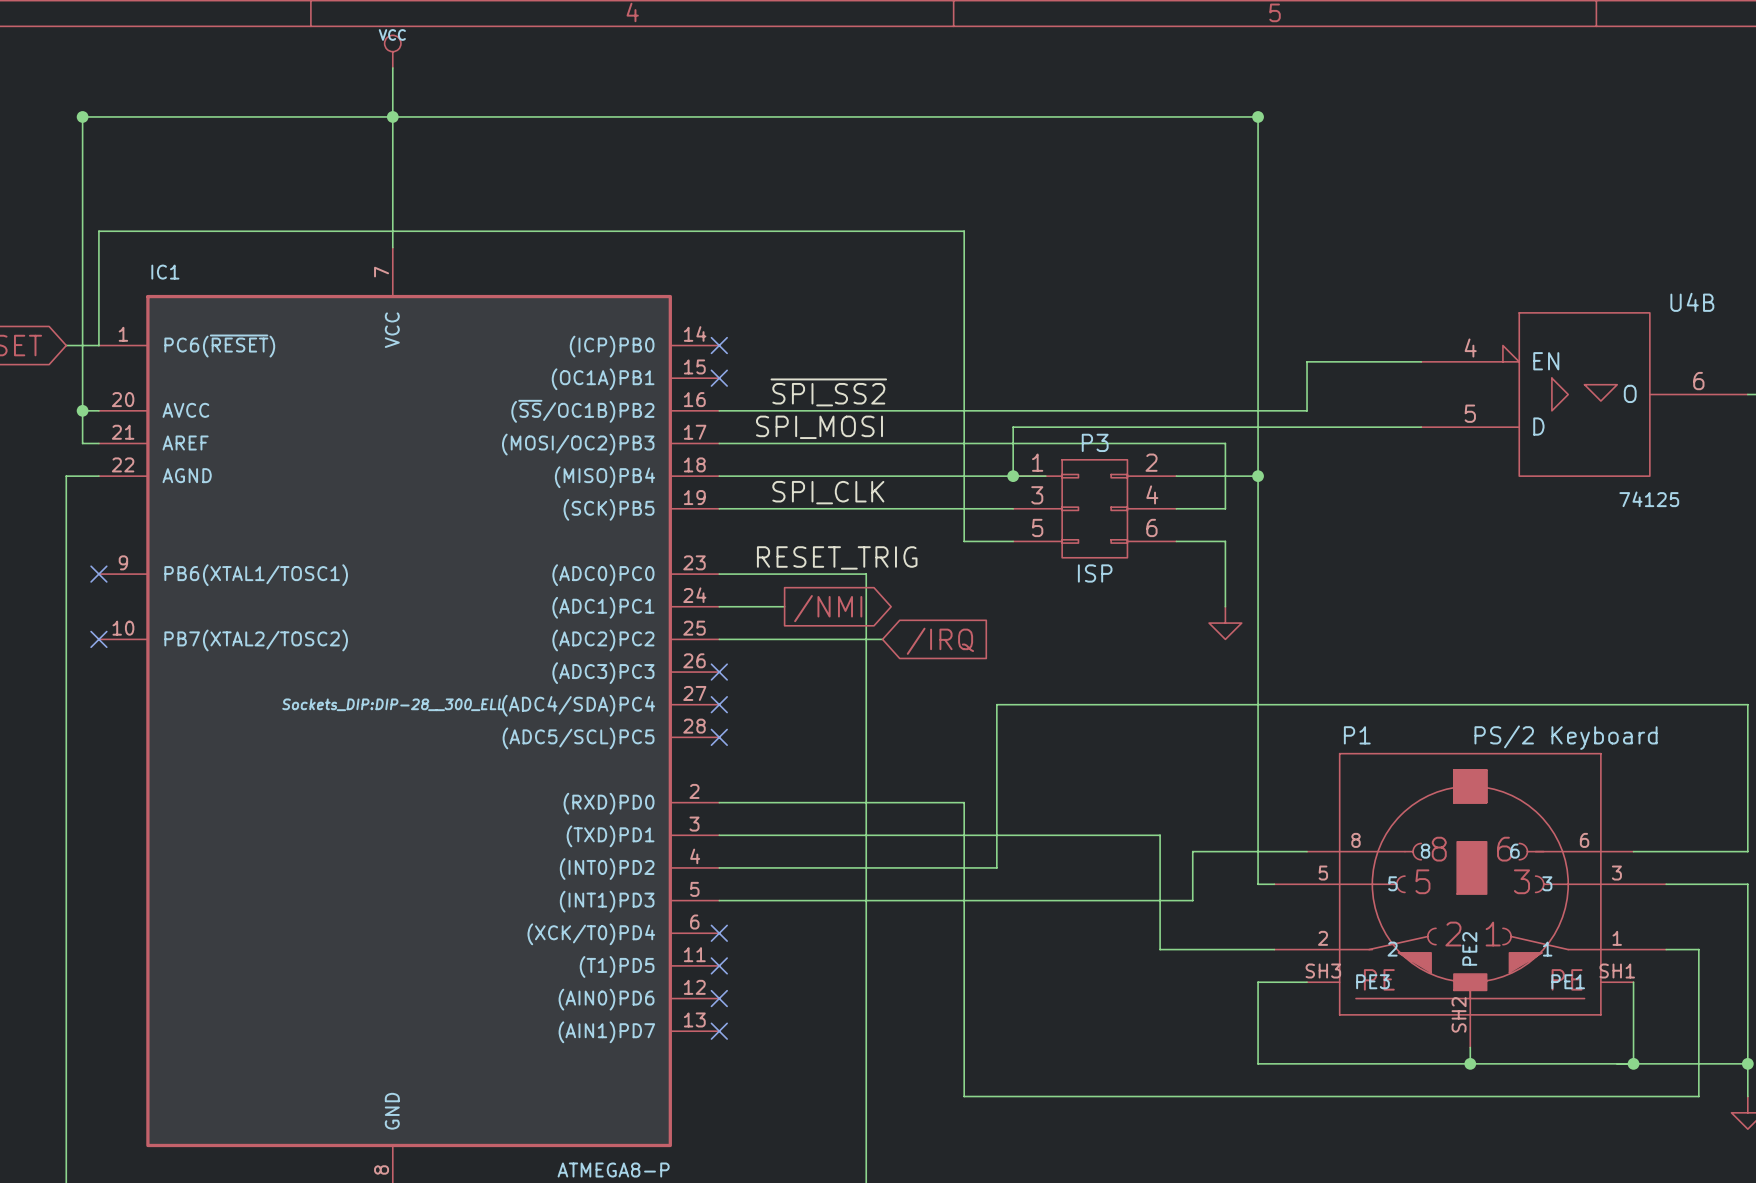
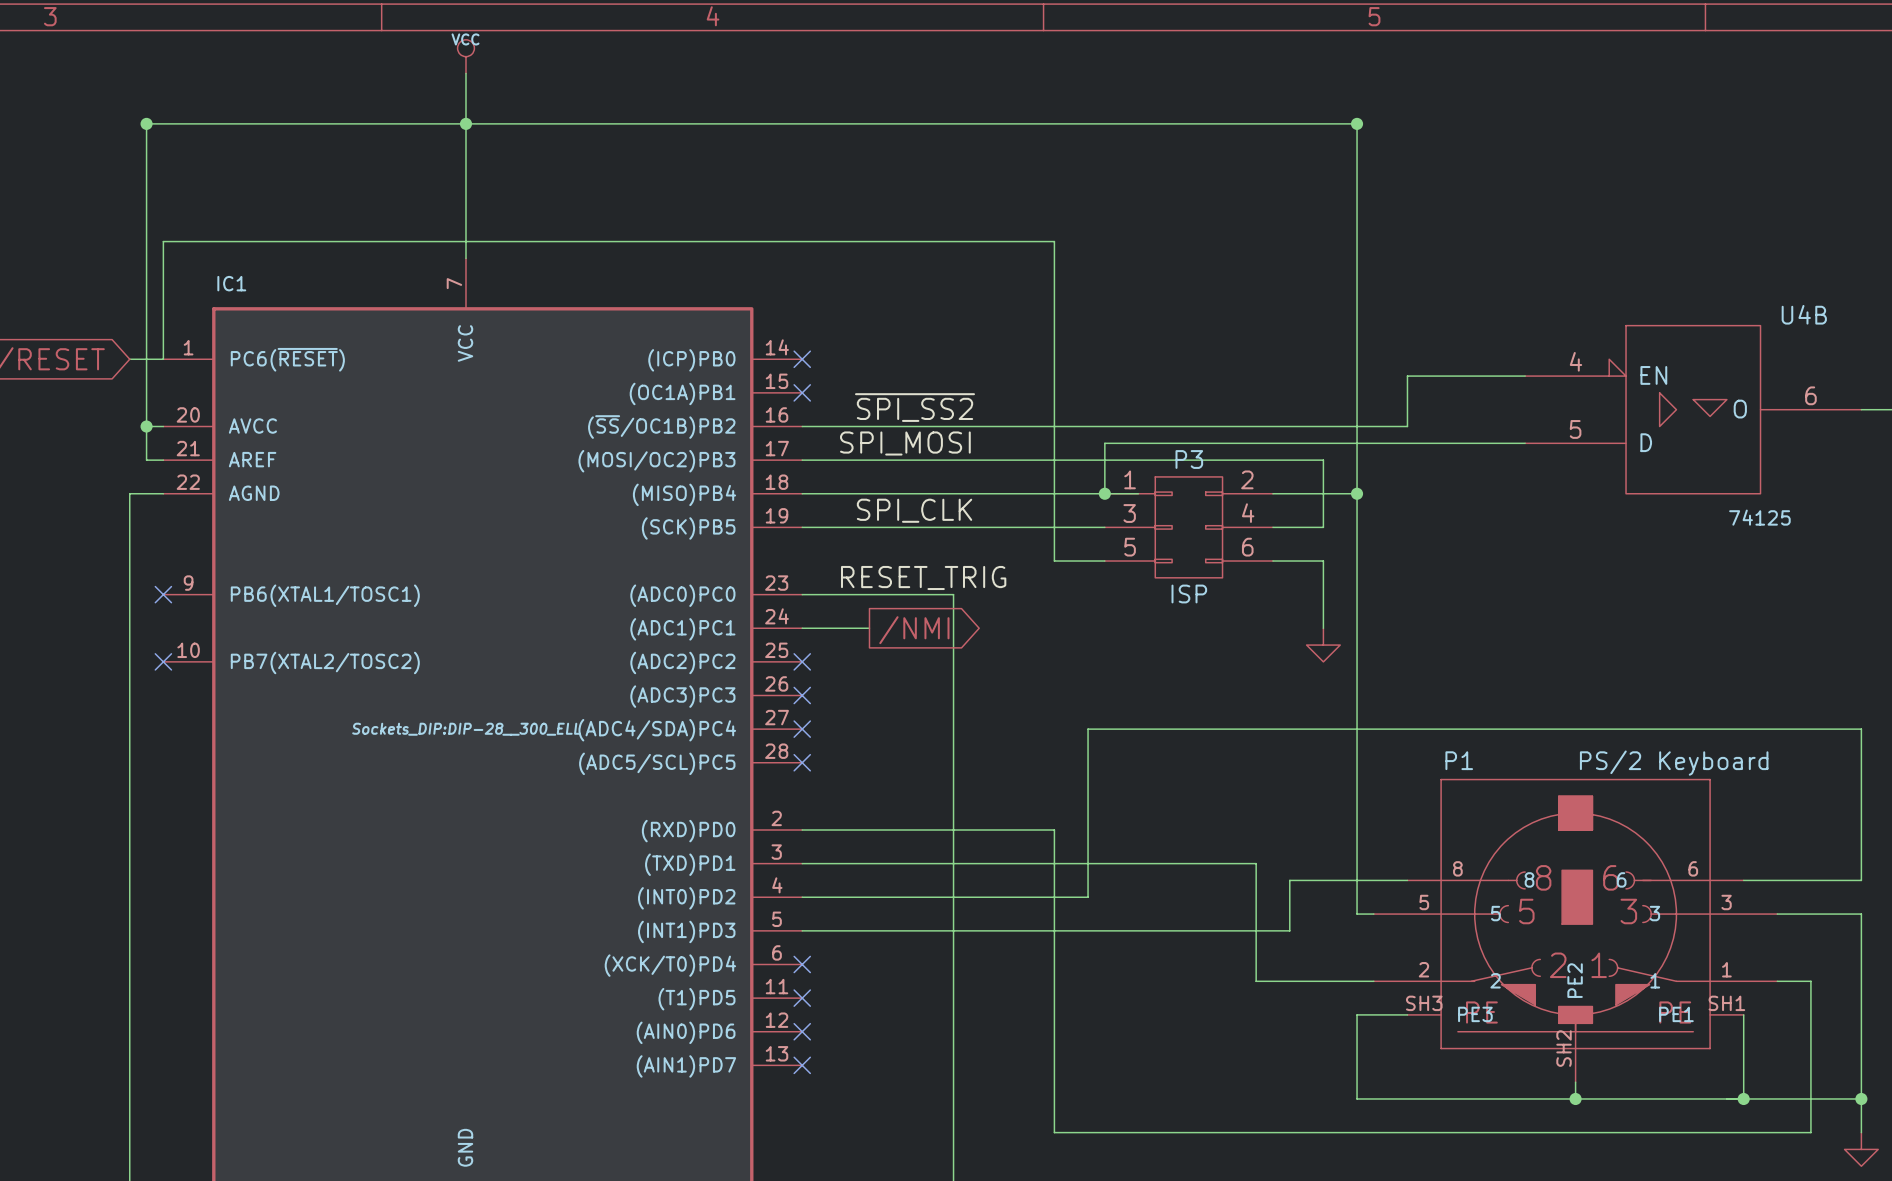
wire: (719, 639) (882, 639) -> none
no-connect mark: none -> (802, 661)
global label: /IRQ (940, 641) -> none

